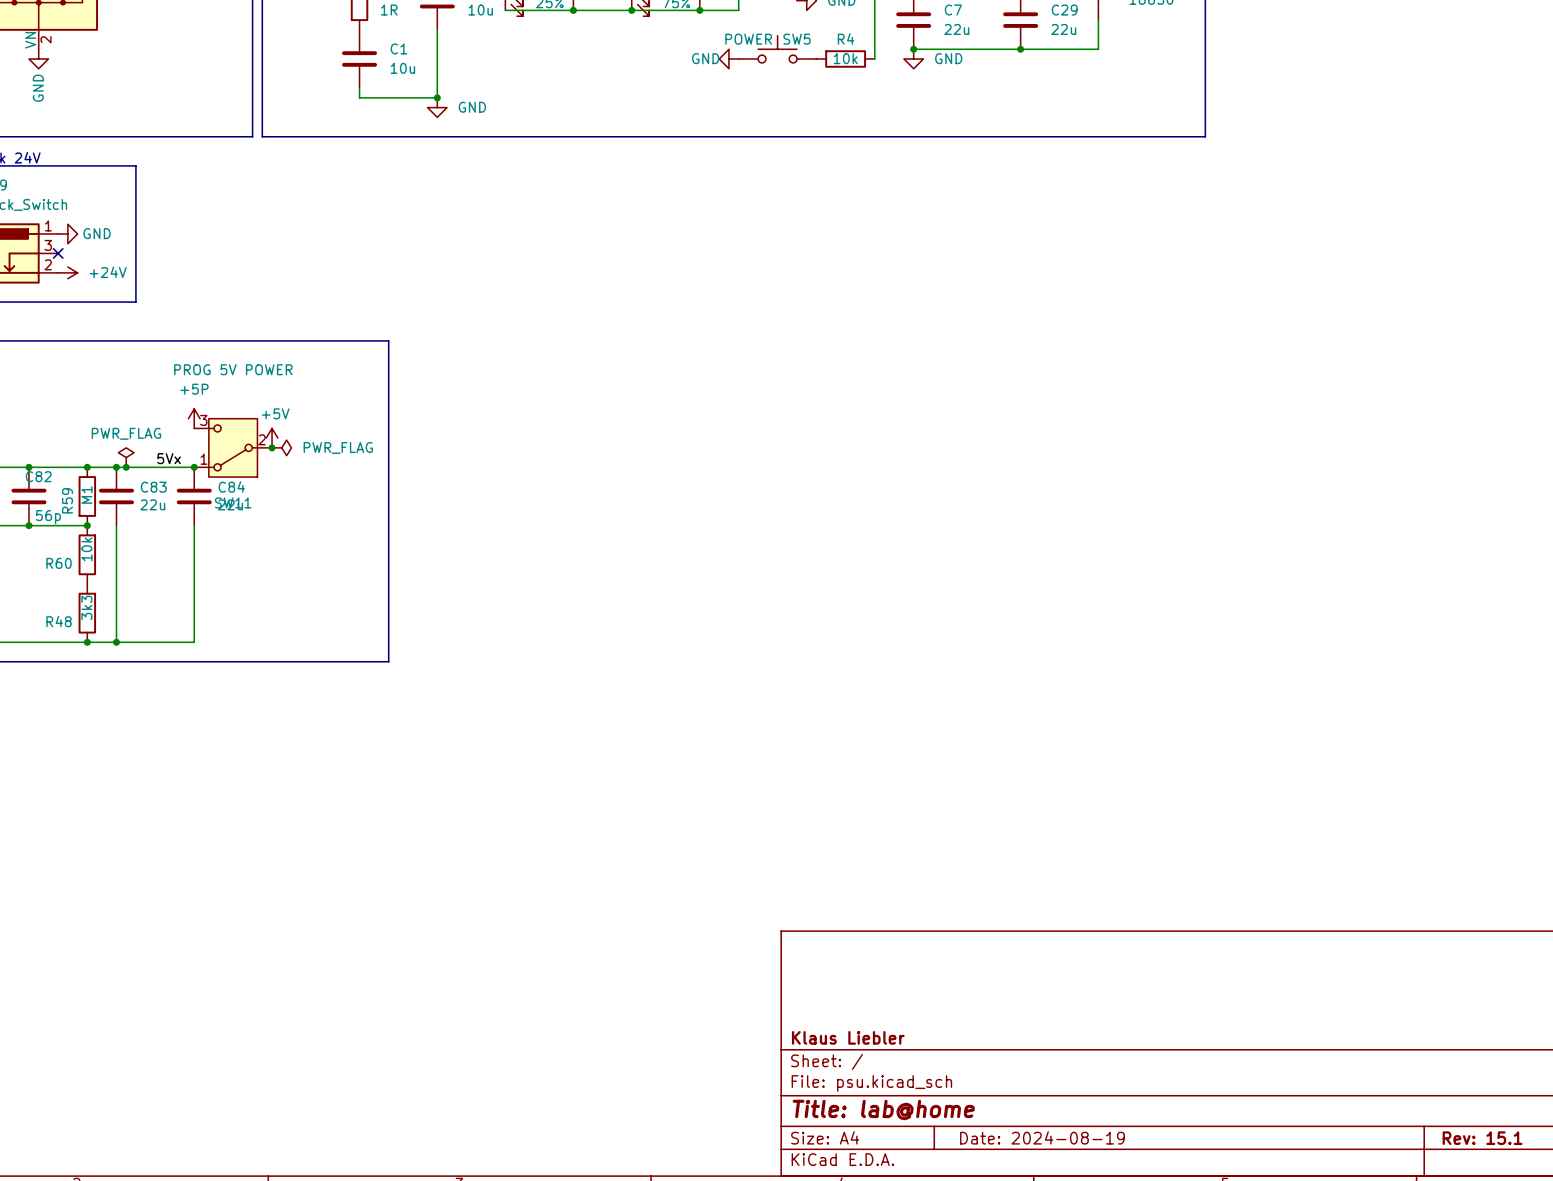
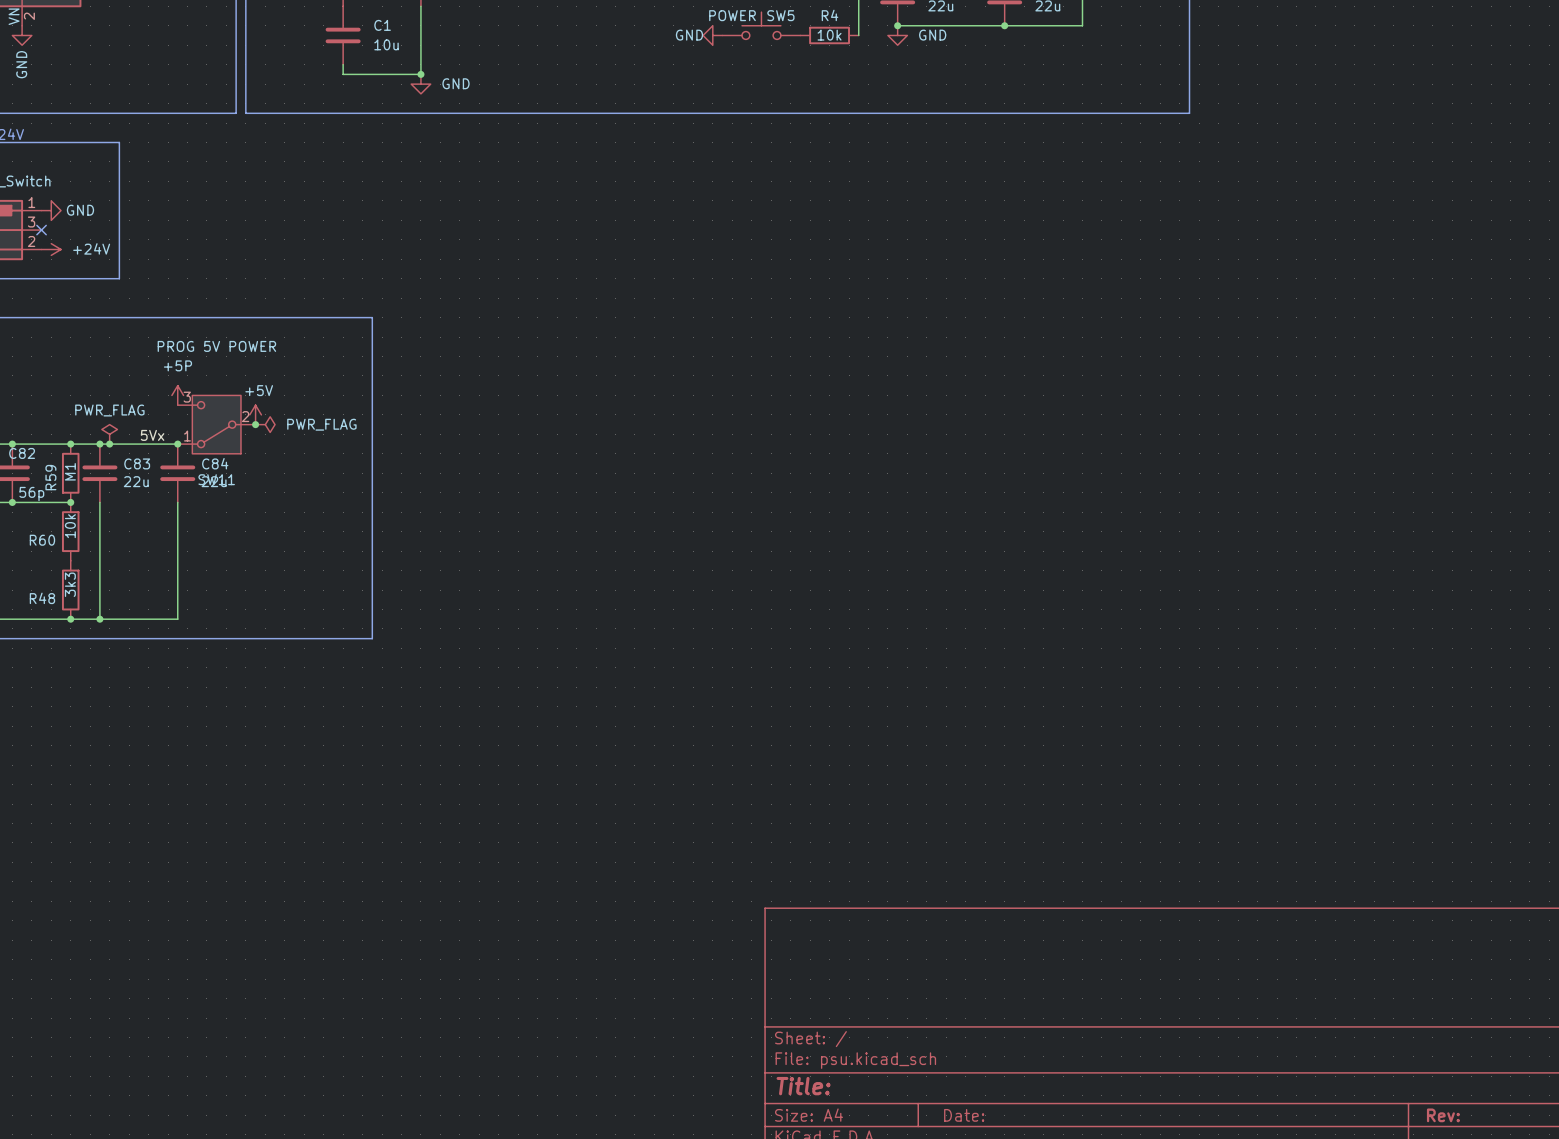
title block: Klaus Liebler (848, 1037) -> none
title block: Title: lab@home (883, 1110) -> Title: (803, 1086)
title block: Date: 2024-08-19 (1042, 1137) -> Date: (964, 1115)
title block: Rev: 15.1 (1482, 1138) -> Rev: (1443, 1115)

